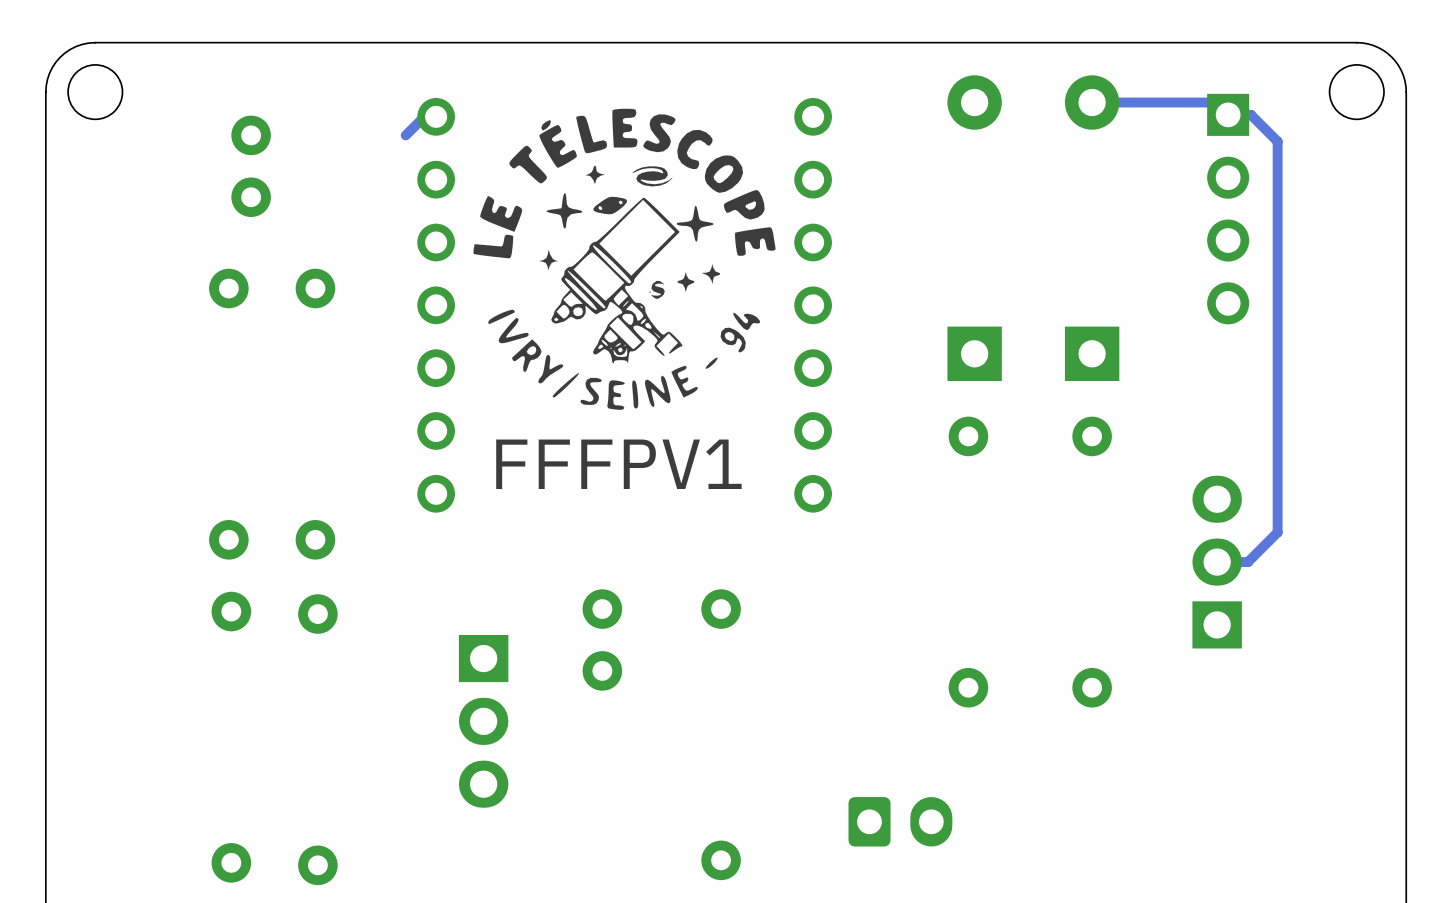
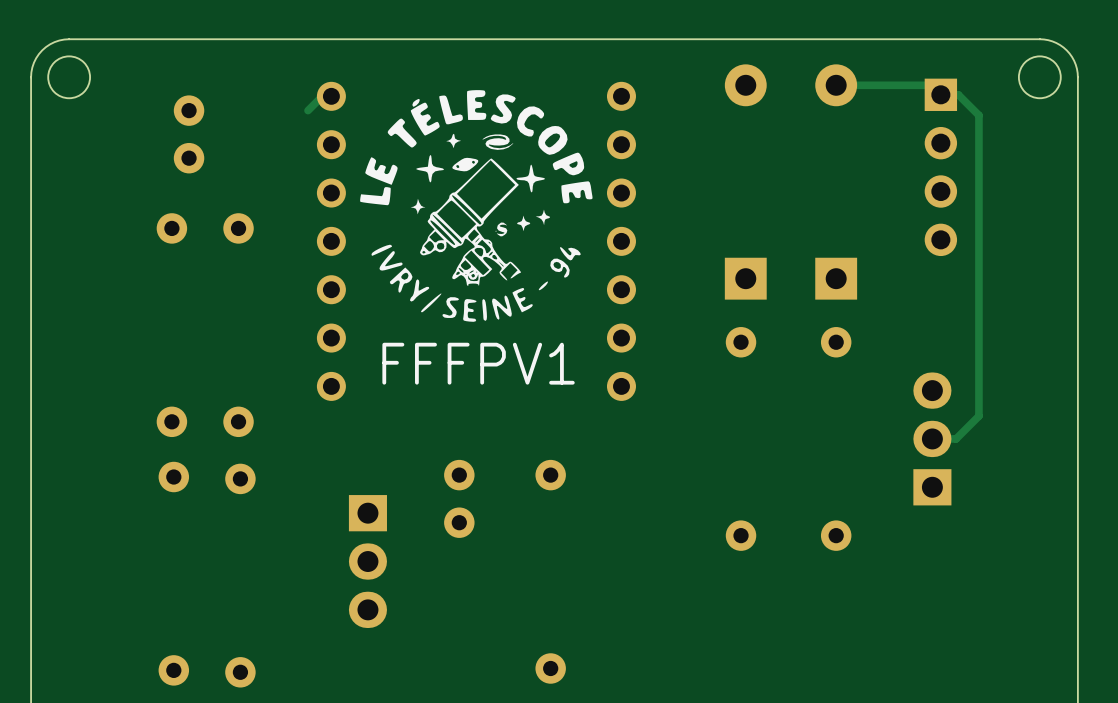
part: (900, 821) -> none

